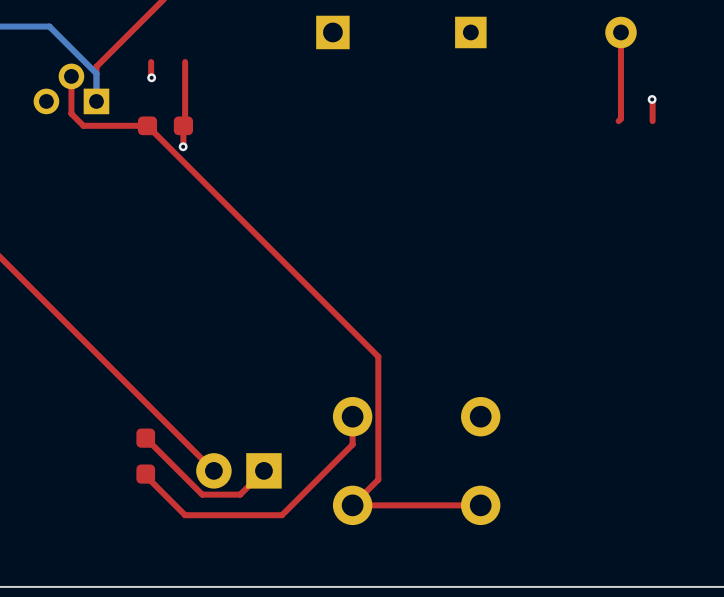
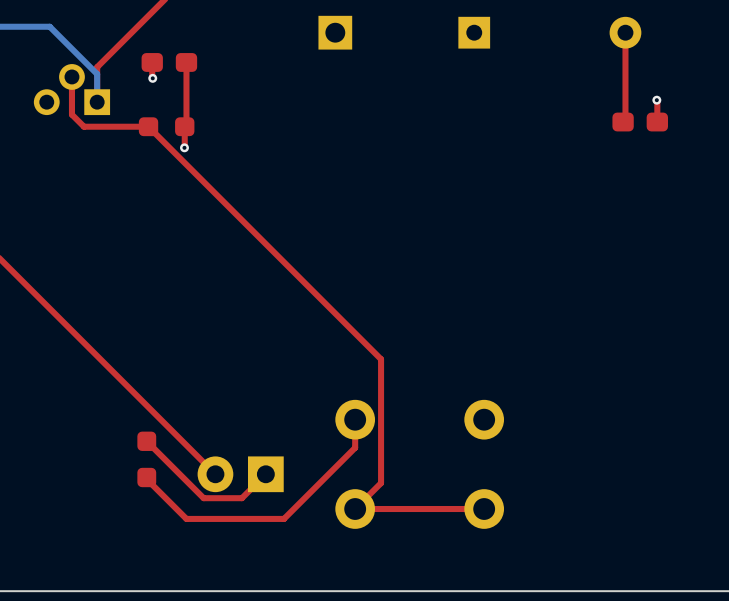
part: none -> (169, 62)
part: none -> (640, 122)

